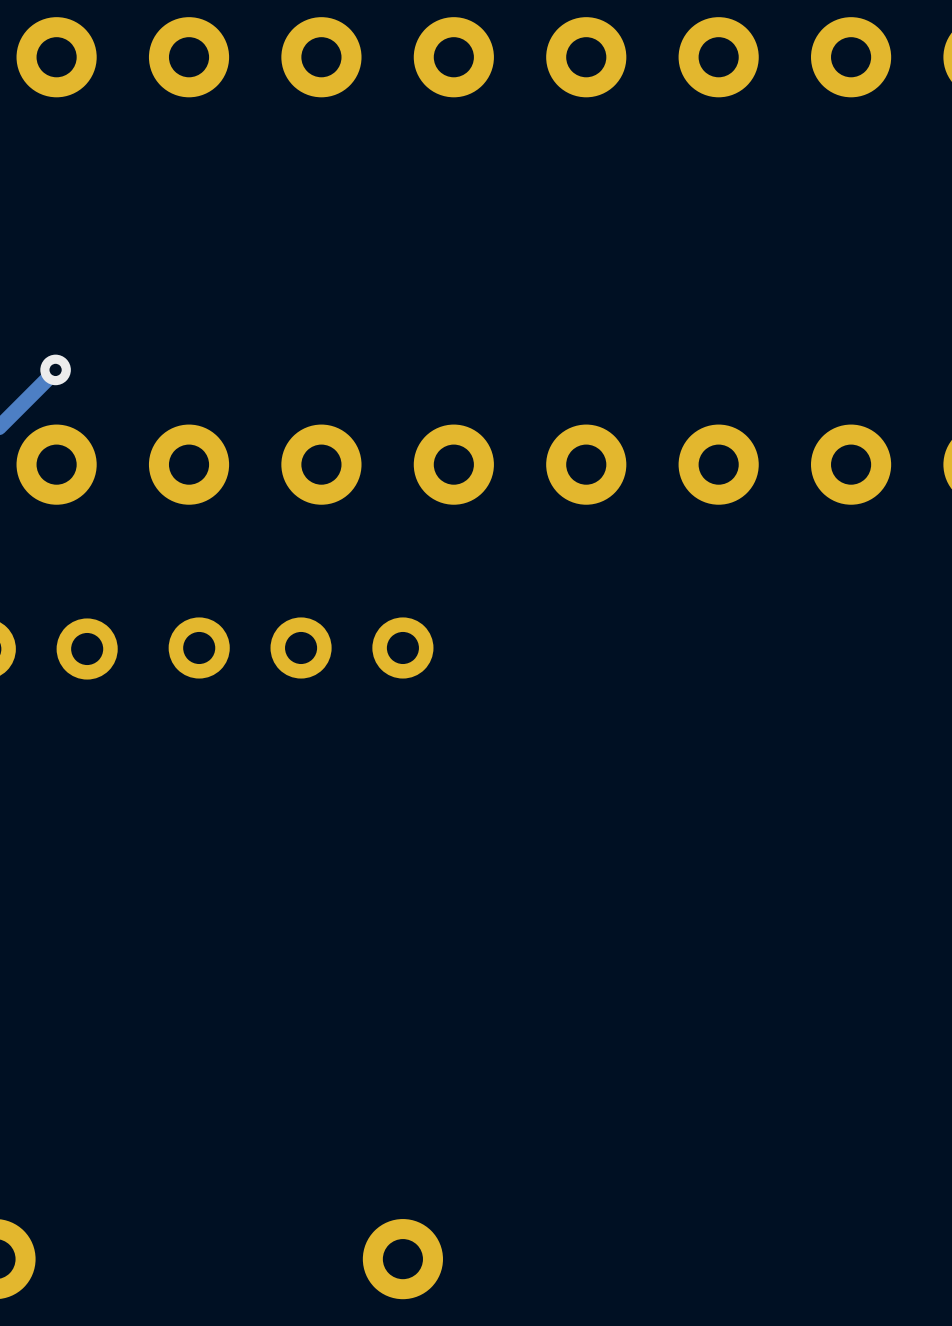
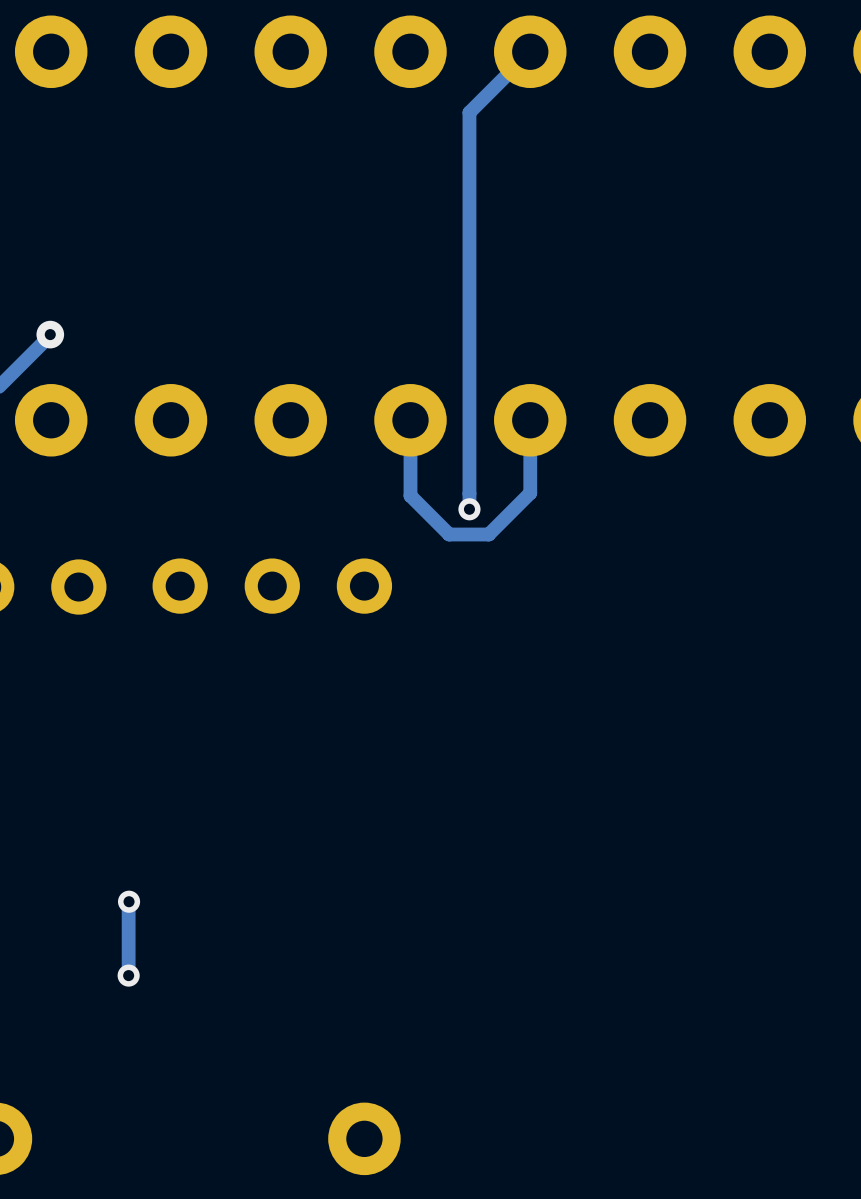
track: none -> (530, 51) (469, 112) (469, 509)
track: none -> (530, 420) (530, 493) (488, 534) (449, 534) (410, 495) (410, 420)
via: none -> (469, 509)
via: none -> (129, 901)
track: none -> (128, 902) (128, 975)
via: none -> (128, 975)

